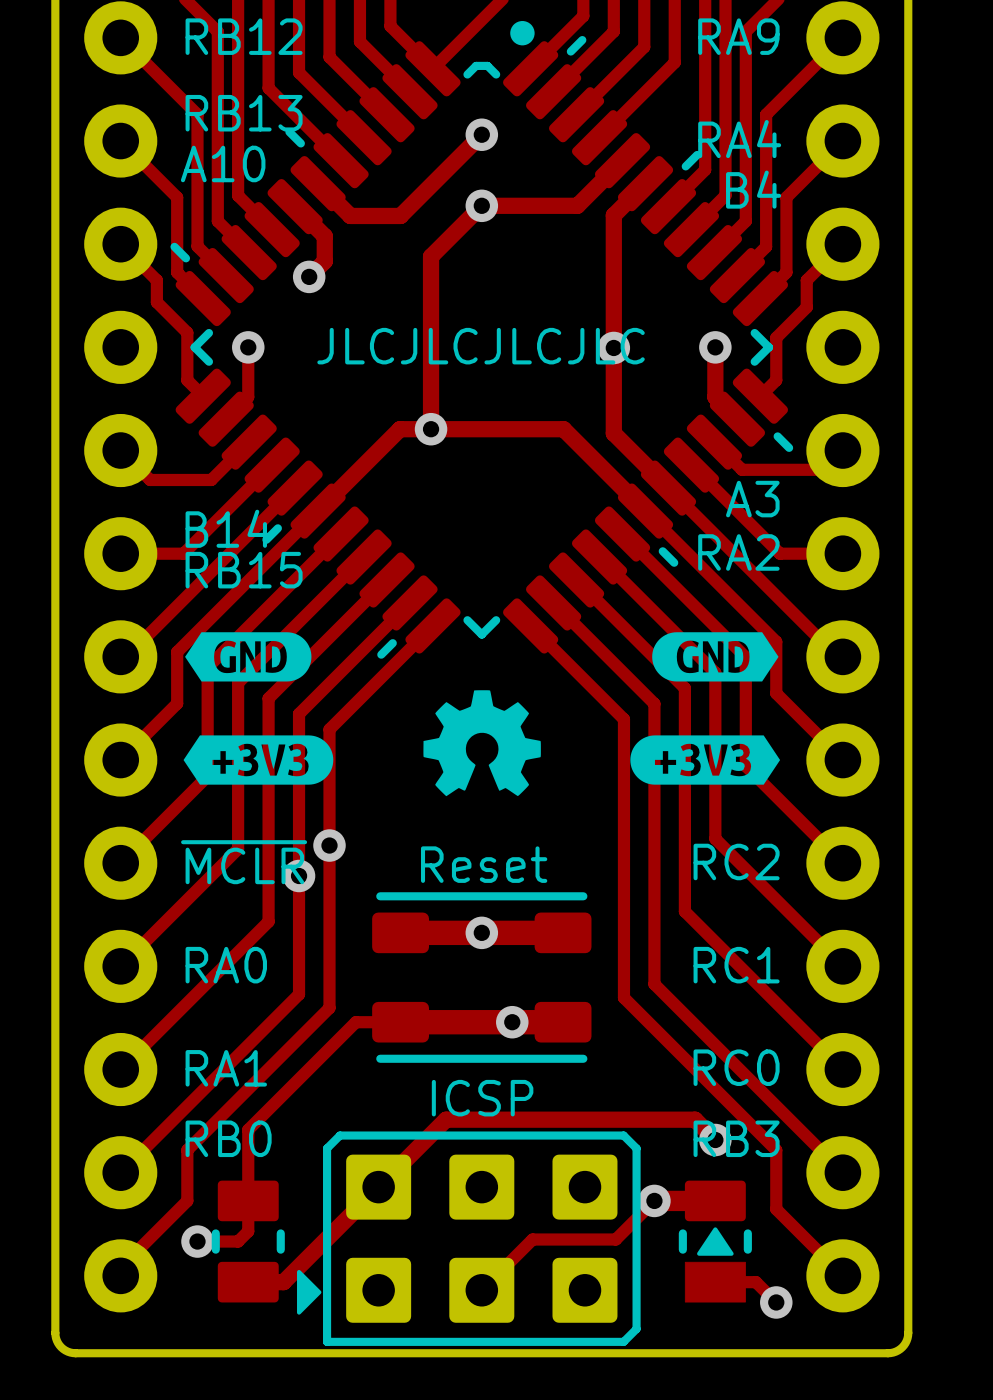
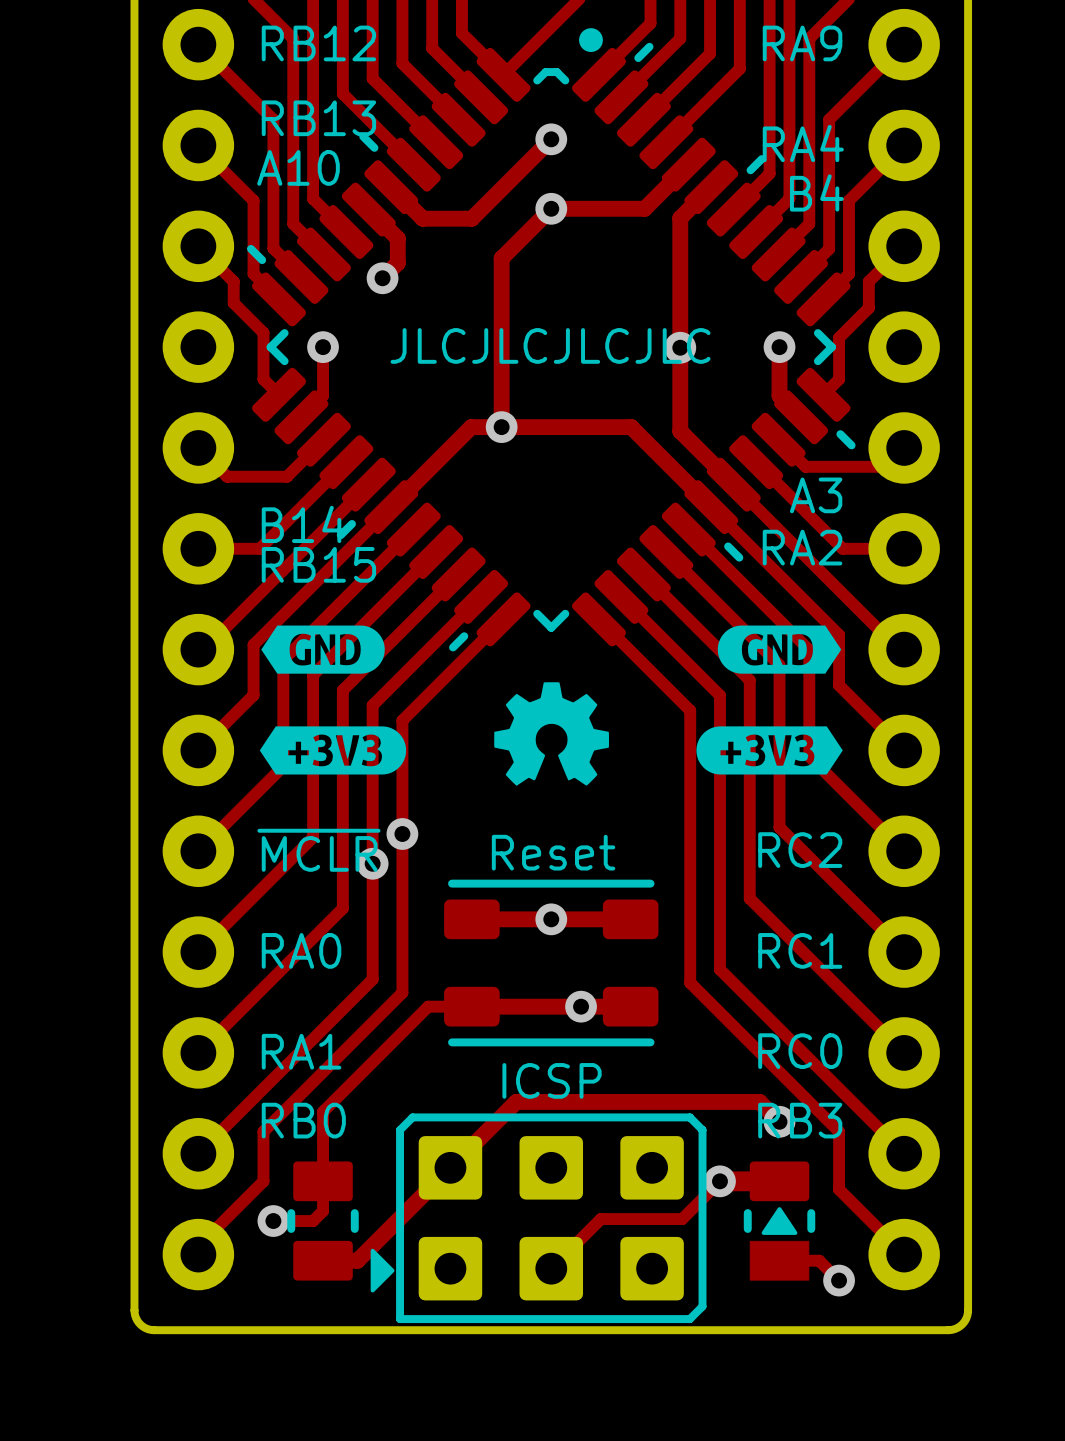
track width: thick (396, 932) (567, 932) -> thin (467, 919) (634, 919)
track width: thick (396, 1022) (567, 1022) -> thin (467, 1006) (634, 1006)

